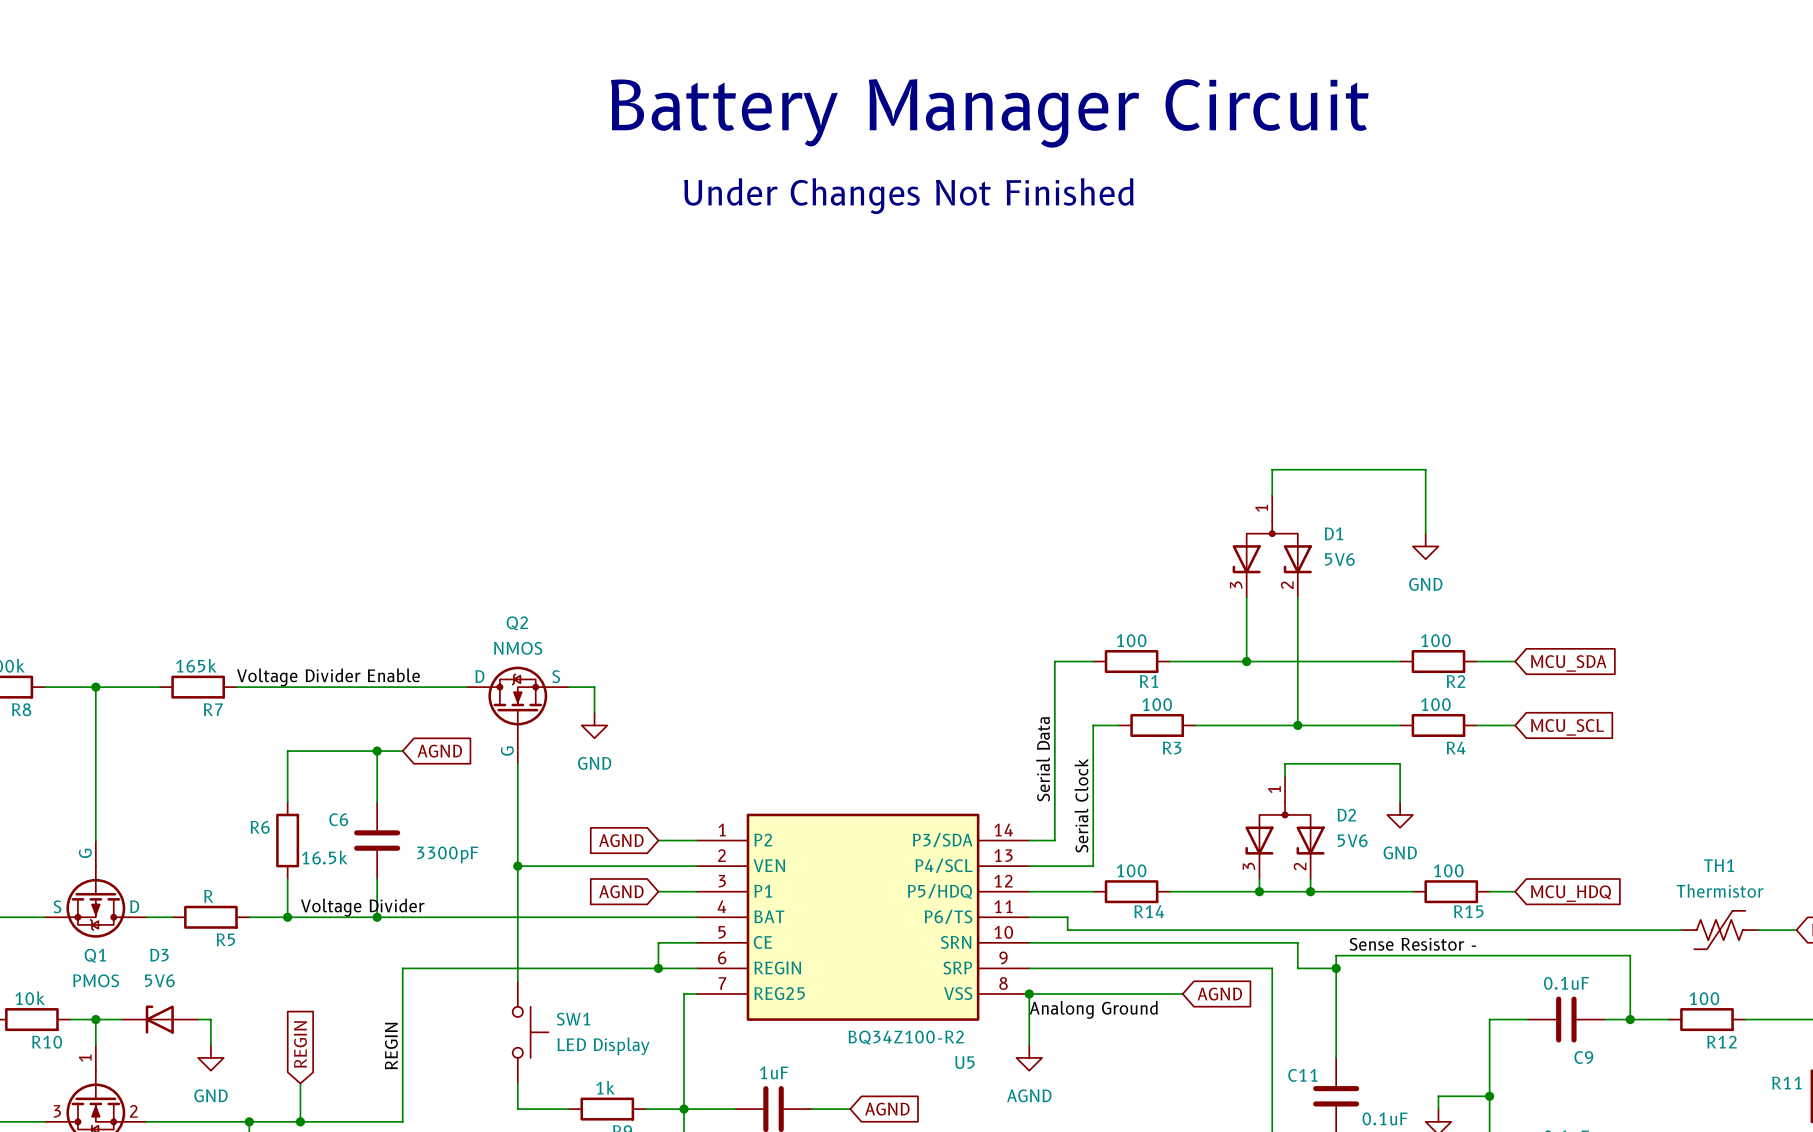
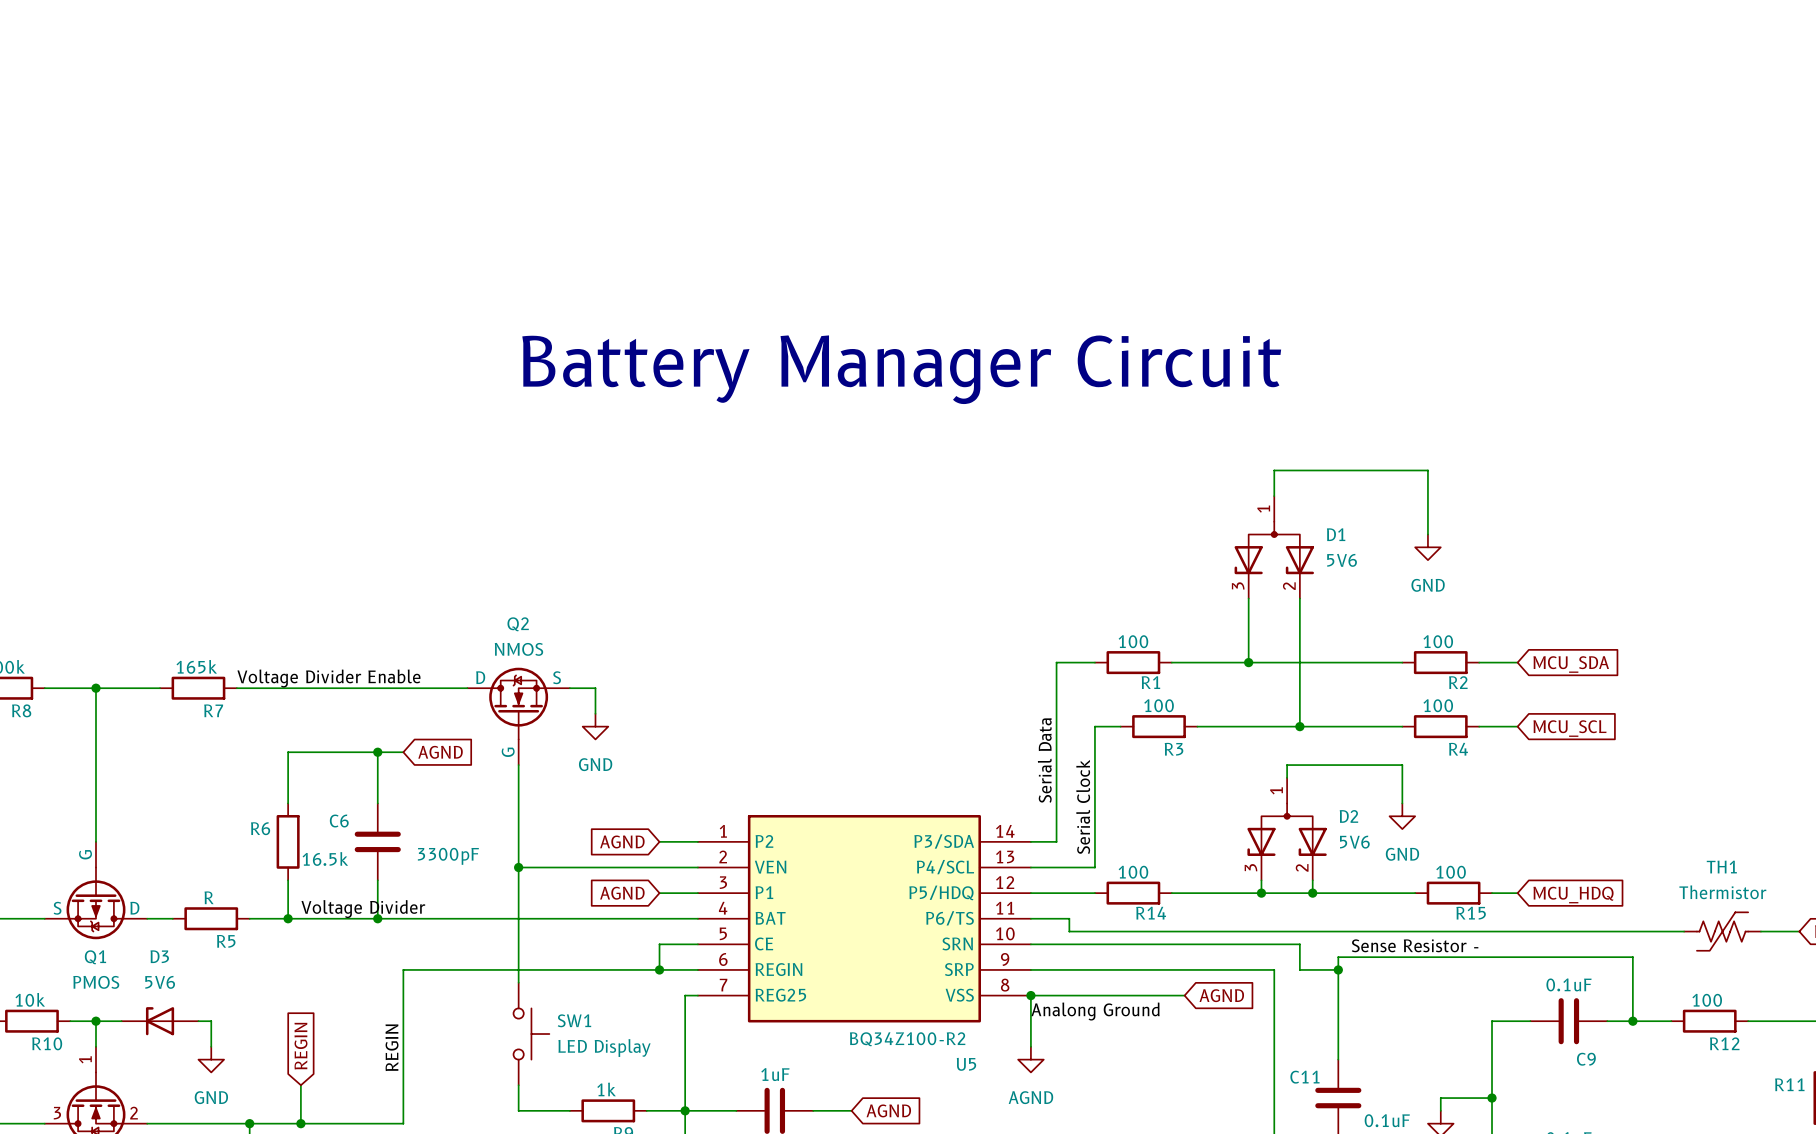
text: Battery Manager Circuit (989, 113) -> none
text: Under Changes Not Finished (908, 196) -> none
text: none -> Battery Manager Circuit (901, 369)

